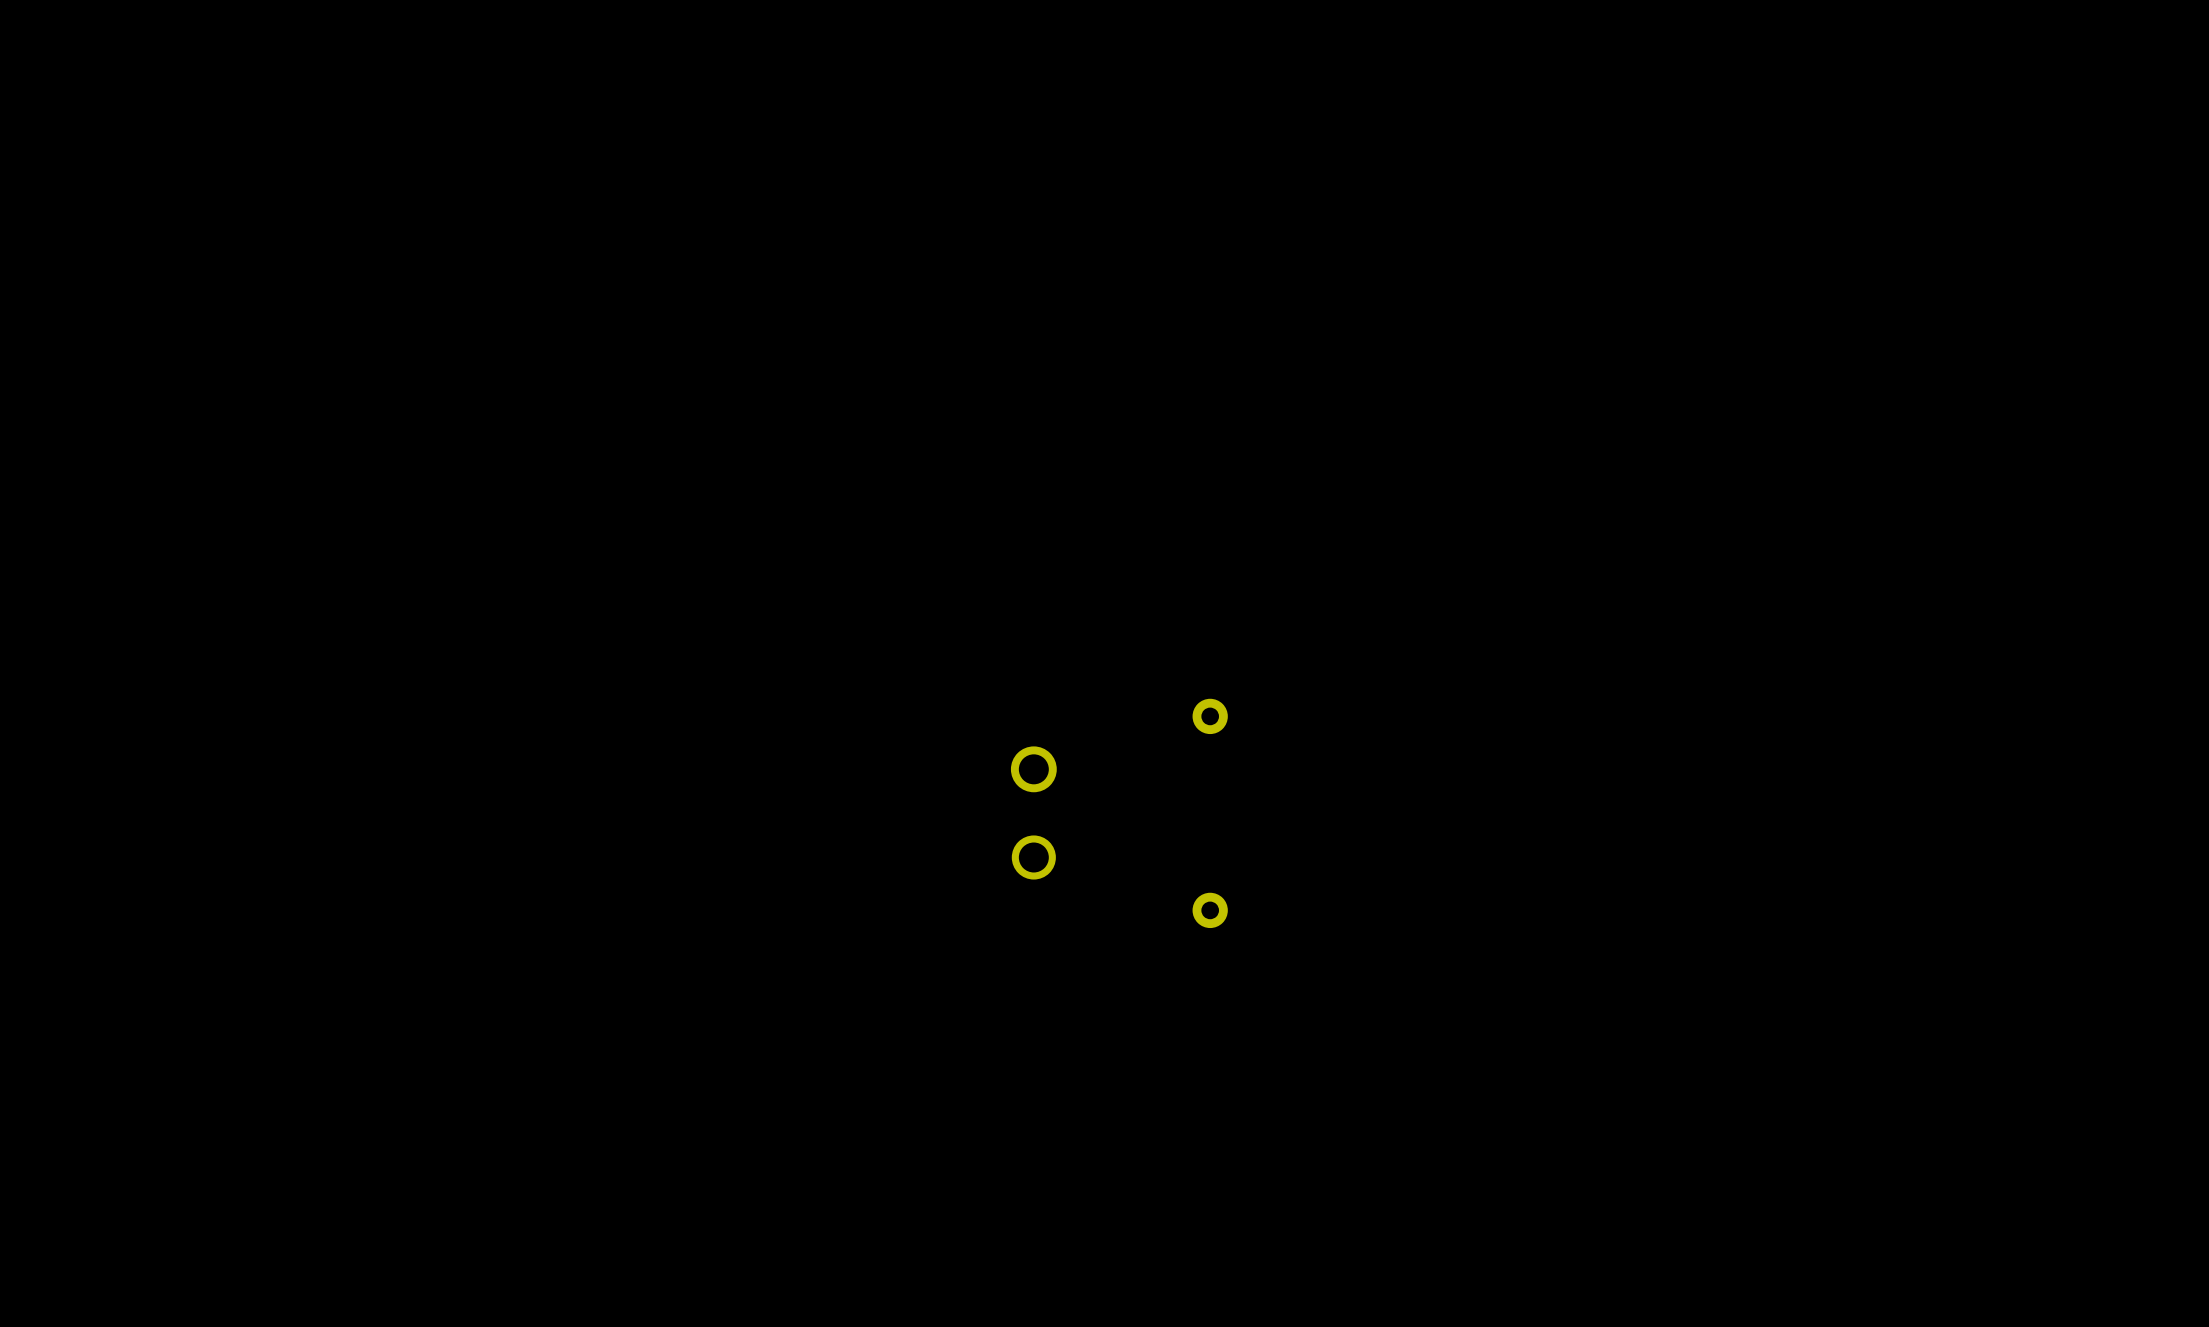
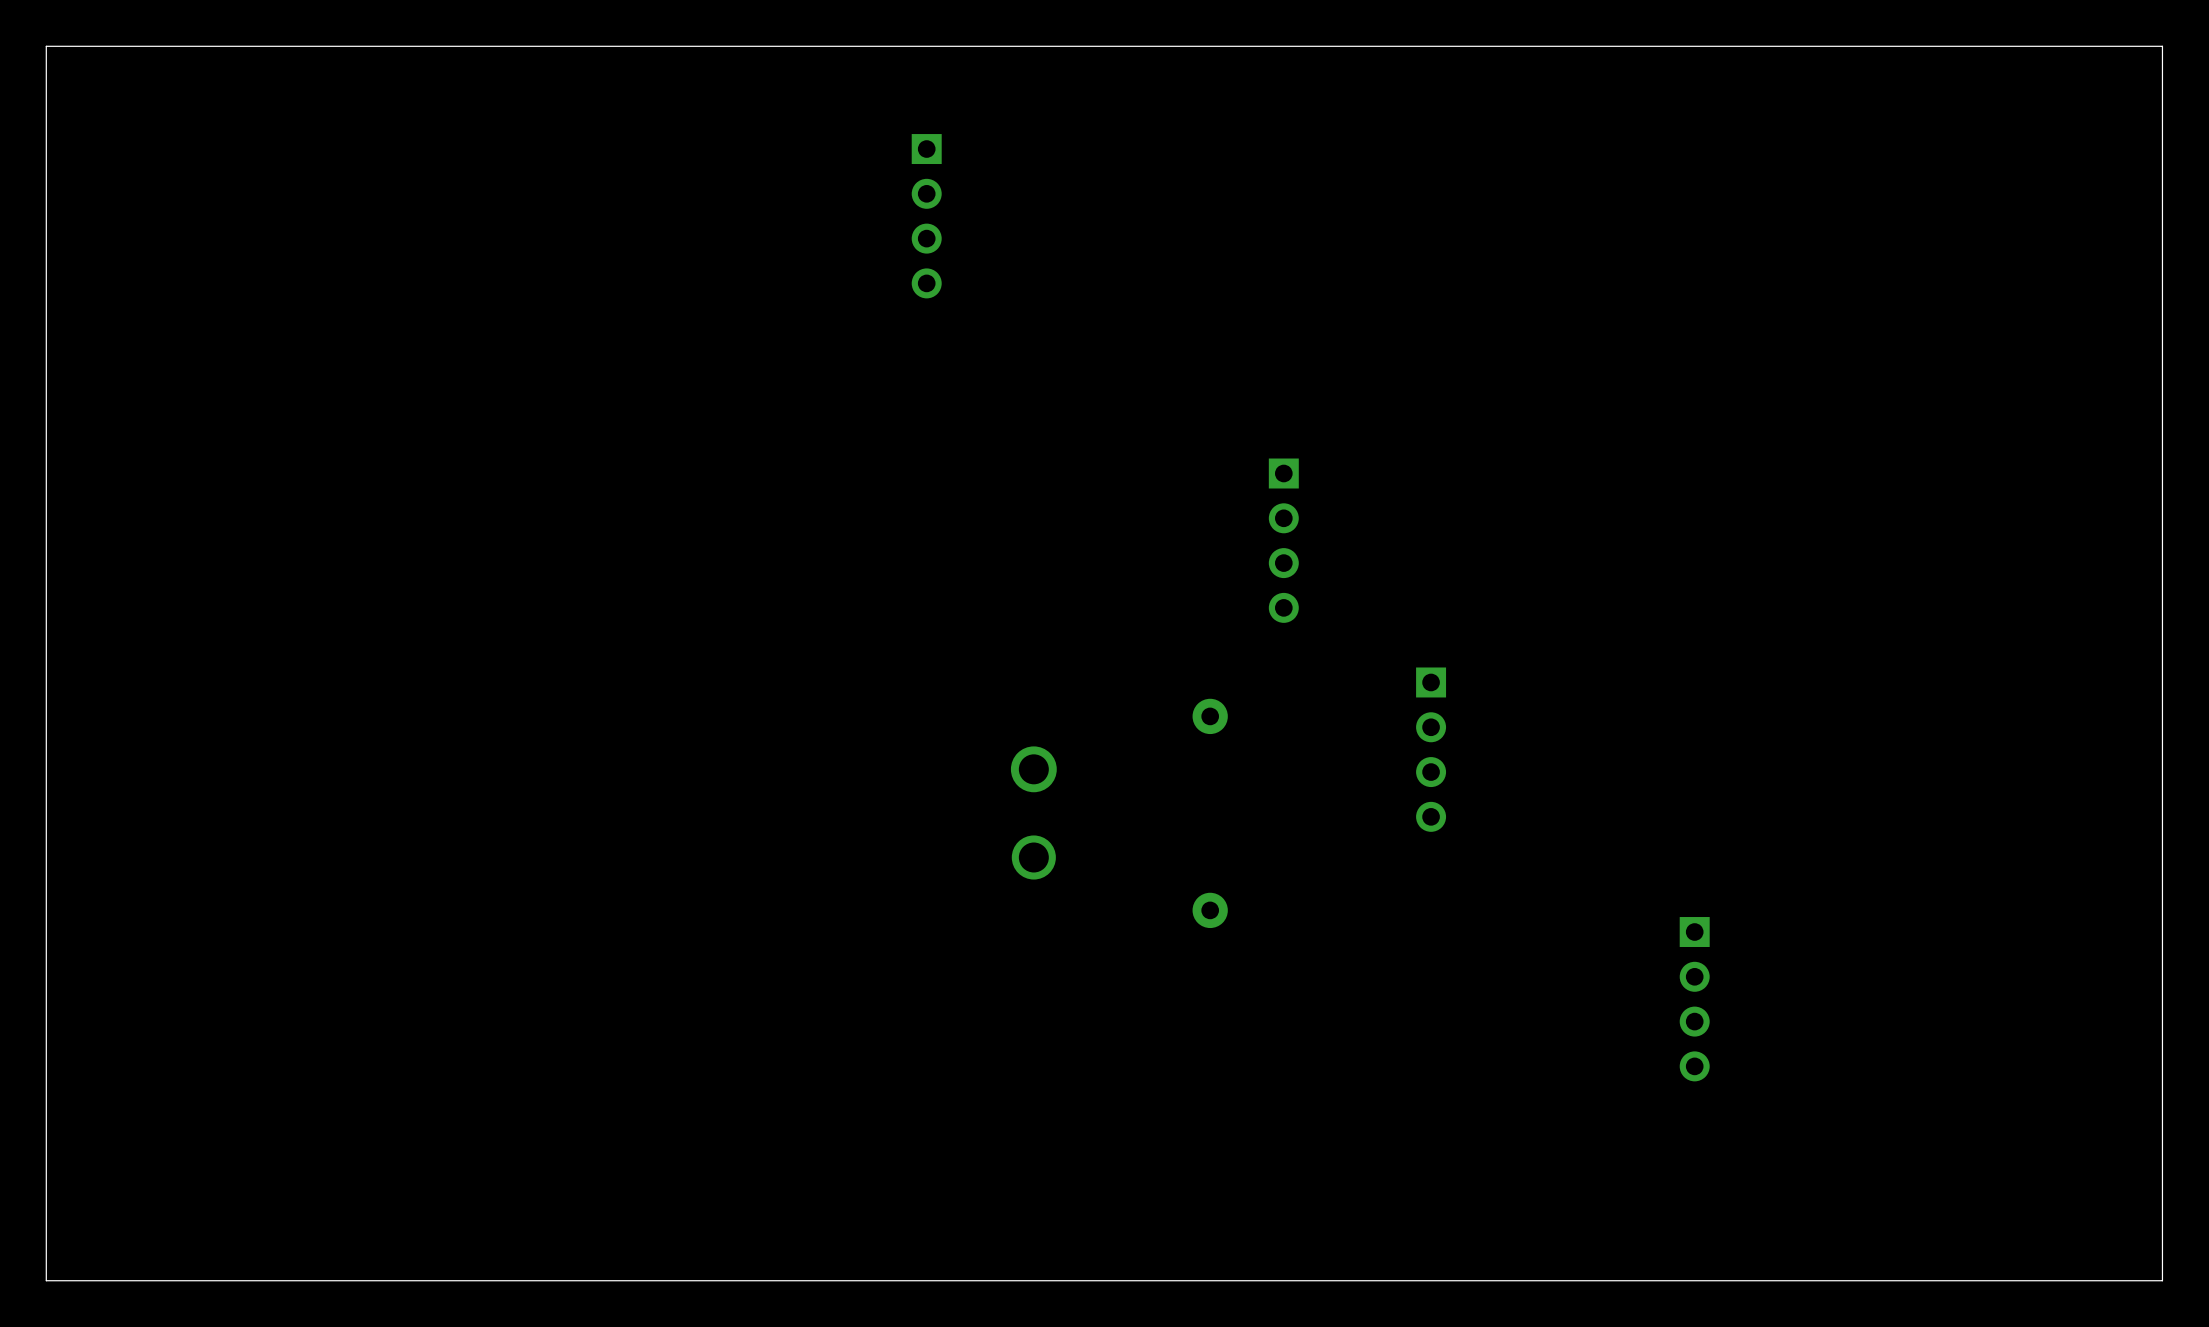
board edge: none -> (2162, 46) (2162, 1280) (46, 1280) (46, 46) (2162, 46)
part: none -> (926, 216)
part: none -> (1283, 540)
part: none -> (1431, 749)
part: none -> (1694, 999)

